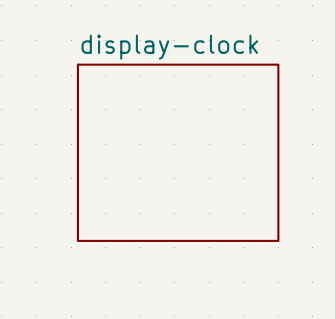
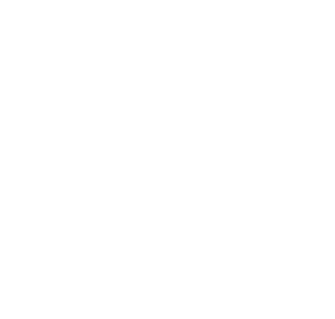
sheet display-clock: (178, 152) -> none

